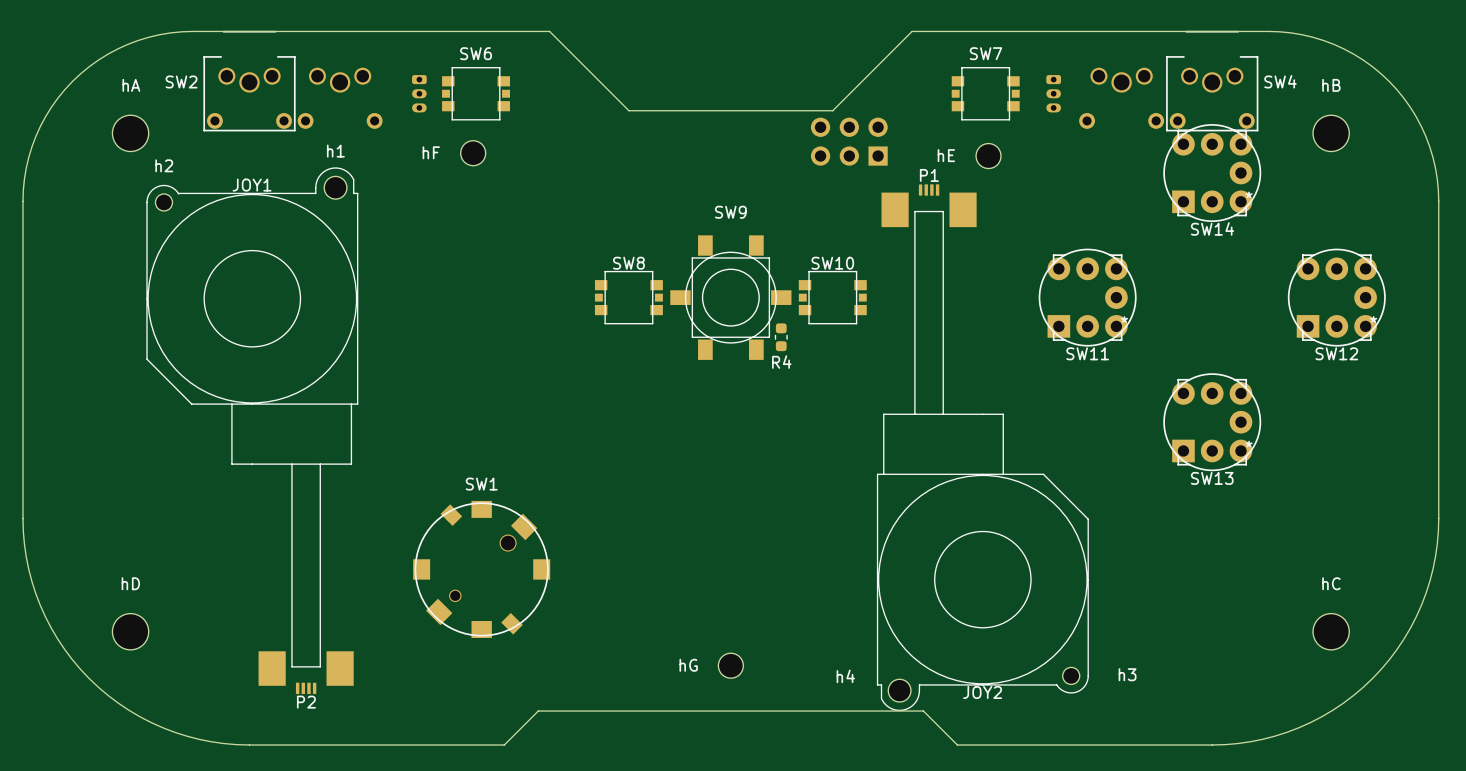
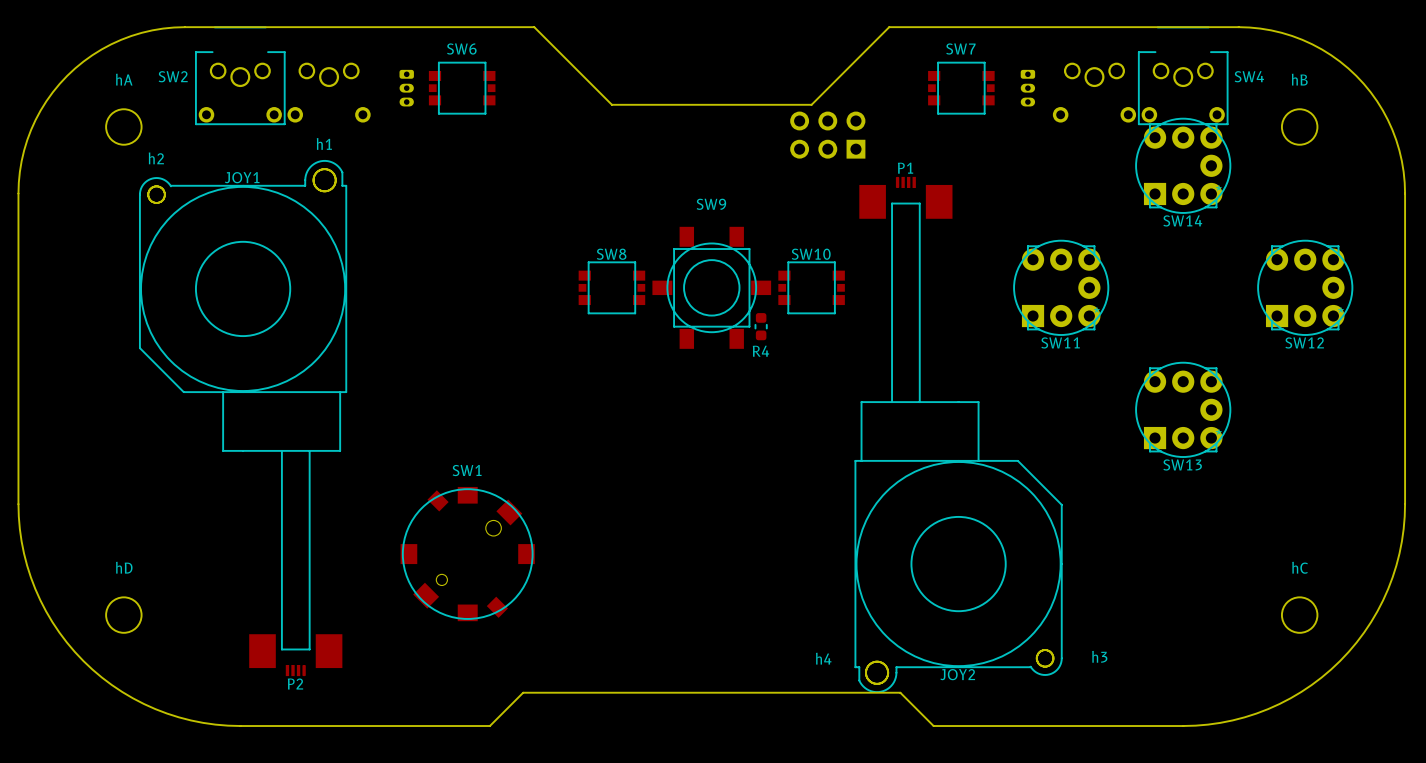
hF: (473, 153) -> none
hE: (988, 156) -> none
JOY1 footprint: [146, 167, 359, 668] -> [139, 160, 347, 651]
JOY2 footprint: [876, 210, 1089, 711] -> [854, 202, 1063, 693]
hG: (730, 665) -> none

